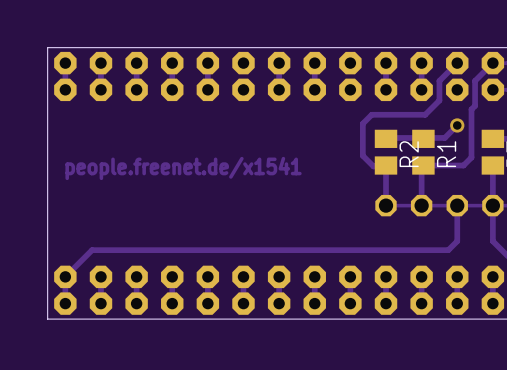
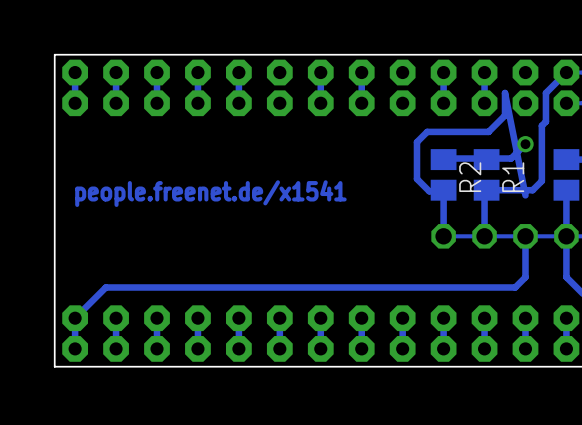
track: (457, 63) (439, 80) -> (525, 195) (505, 93)

